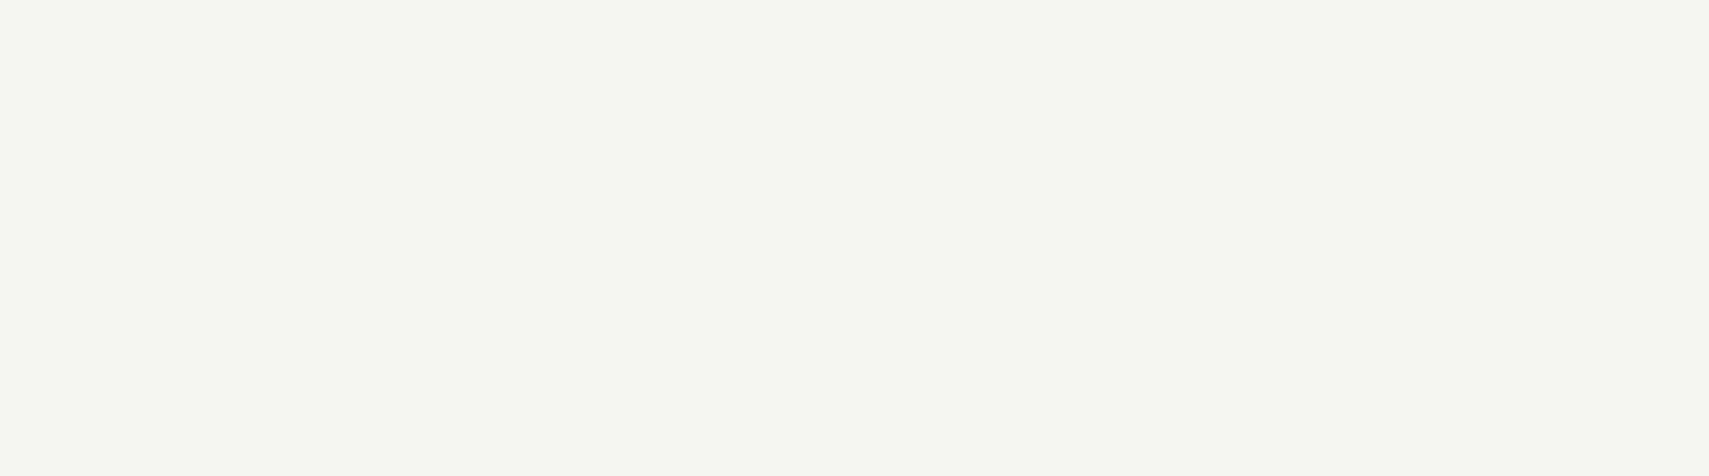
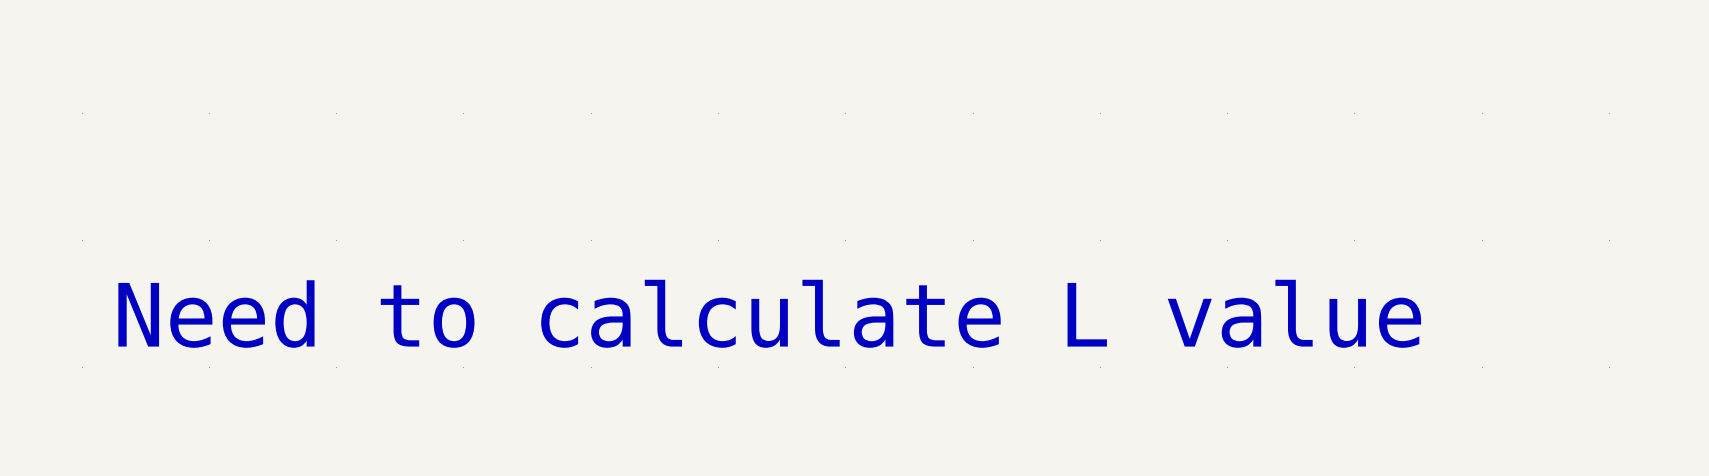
text: none -> Need to calculate L value (769, 313)

